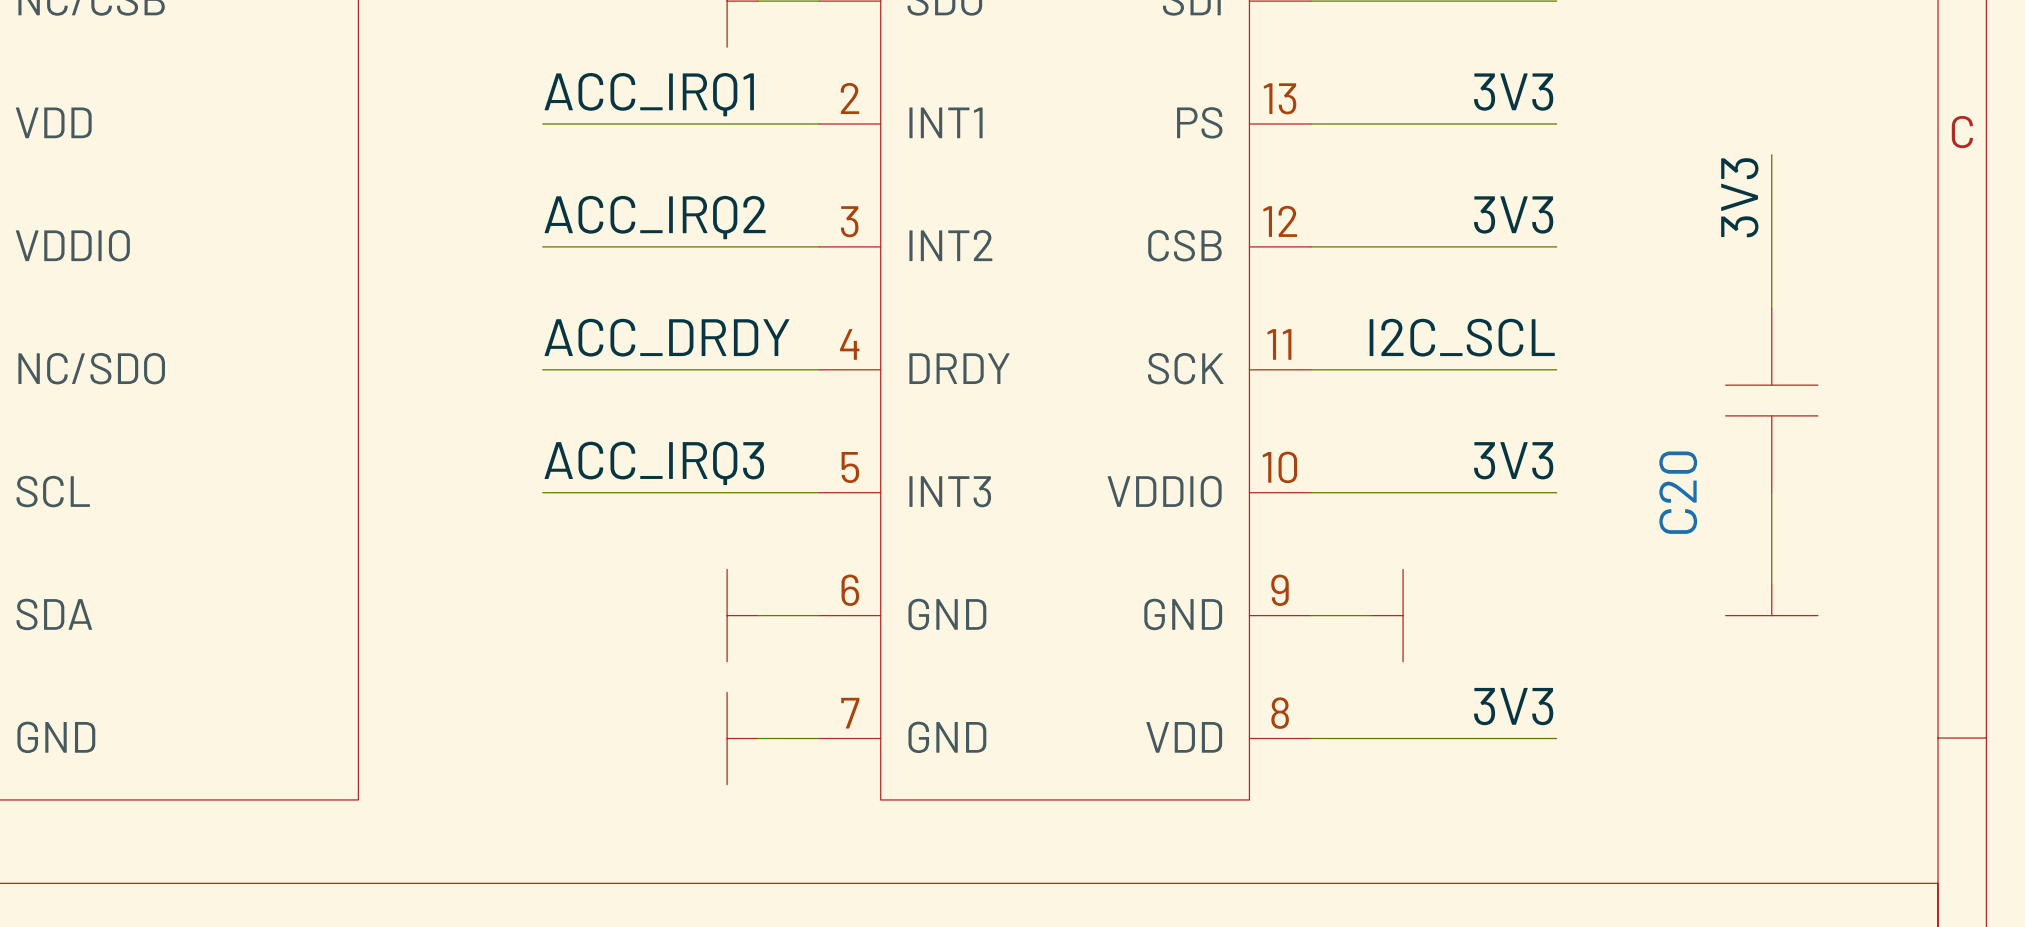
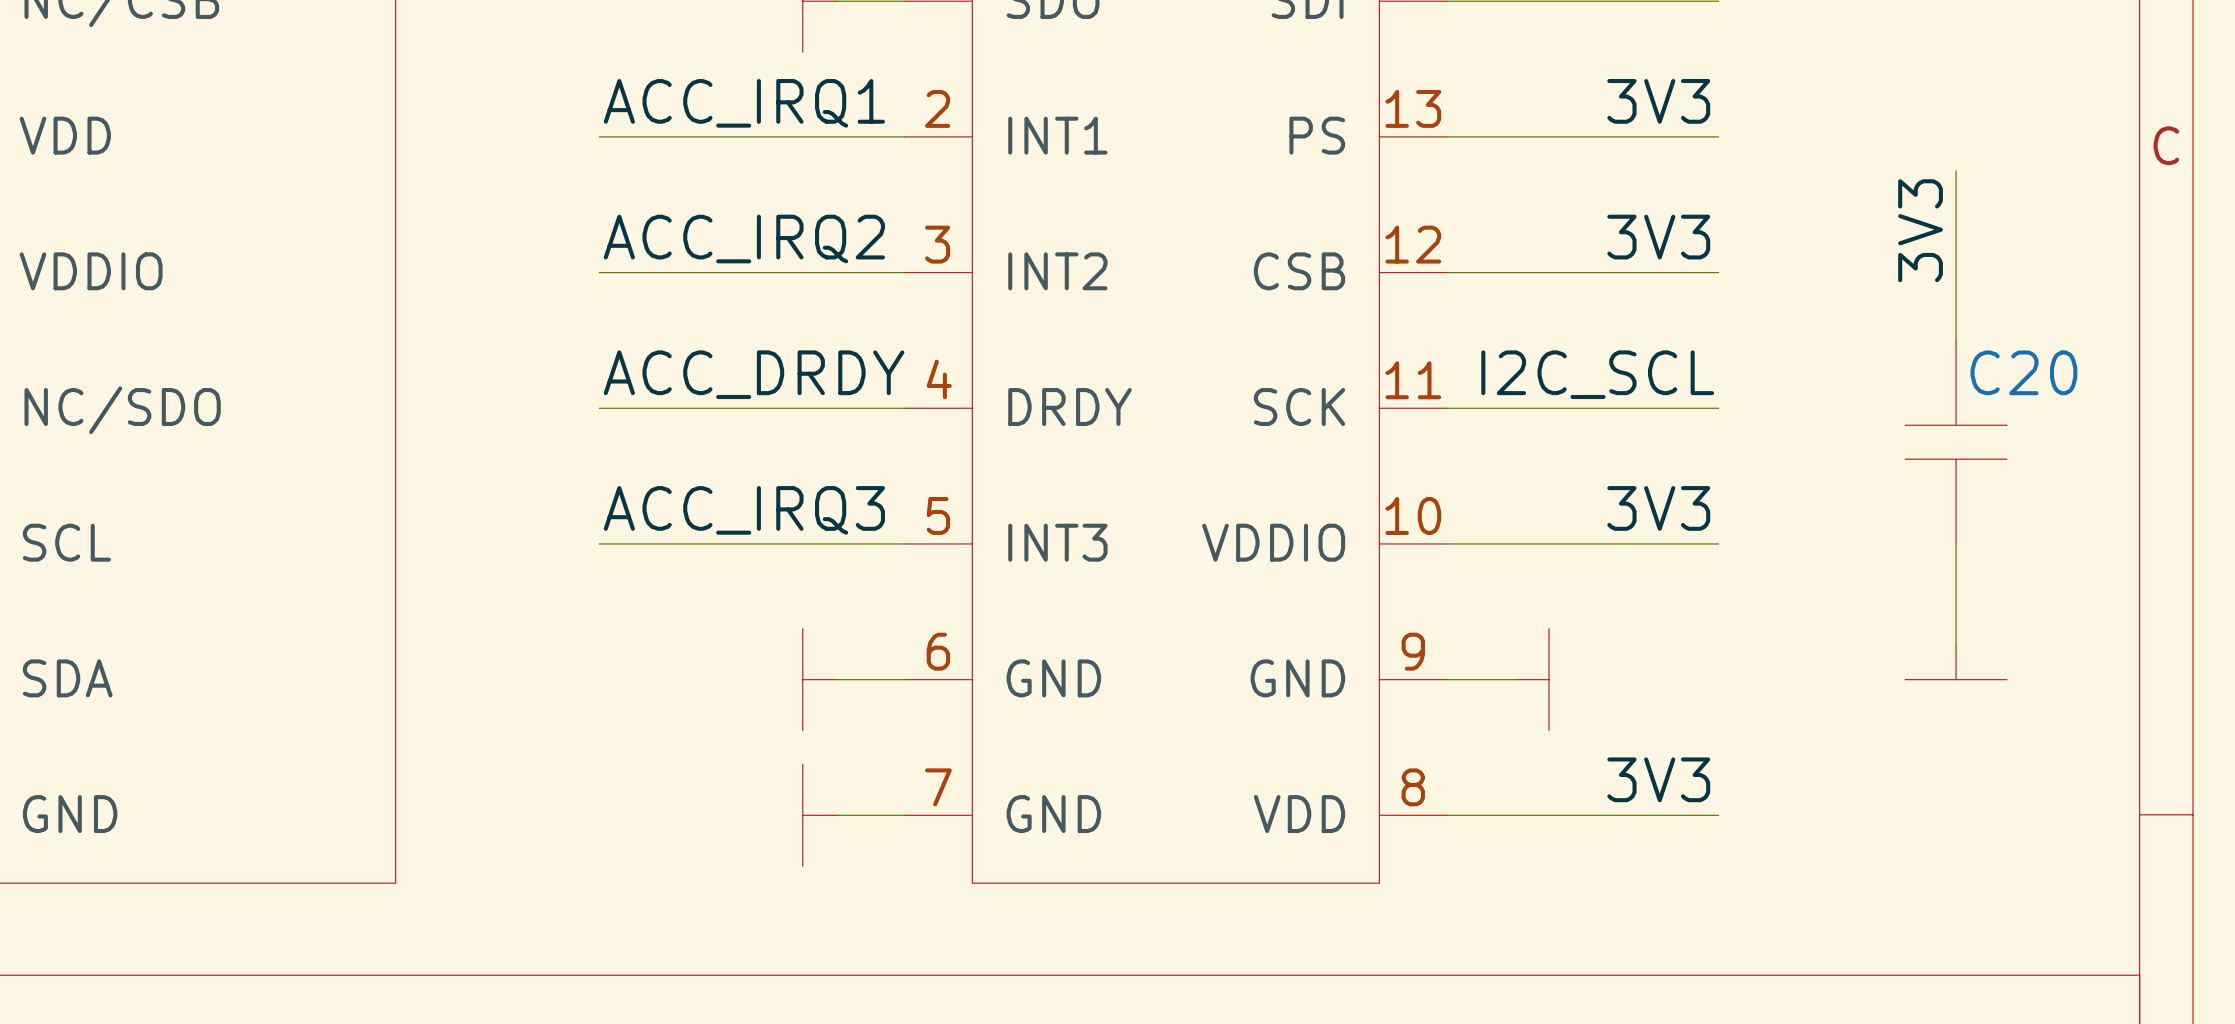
C20 name rotation: 0° (1678, 492) -> 90° clockwise (2023, 372)
C20 name position: C20 (1678, 492) -> C20 (2023, 372)

